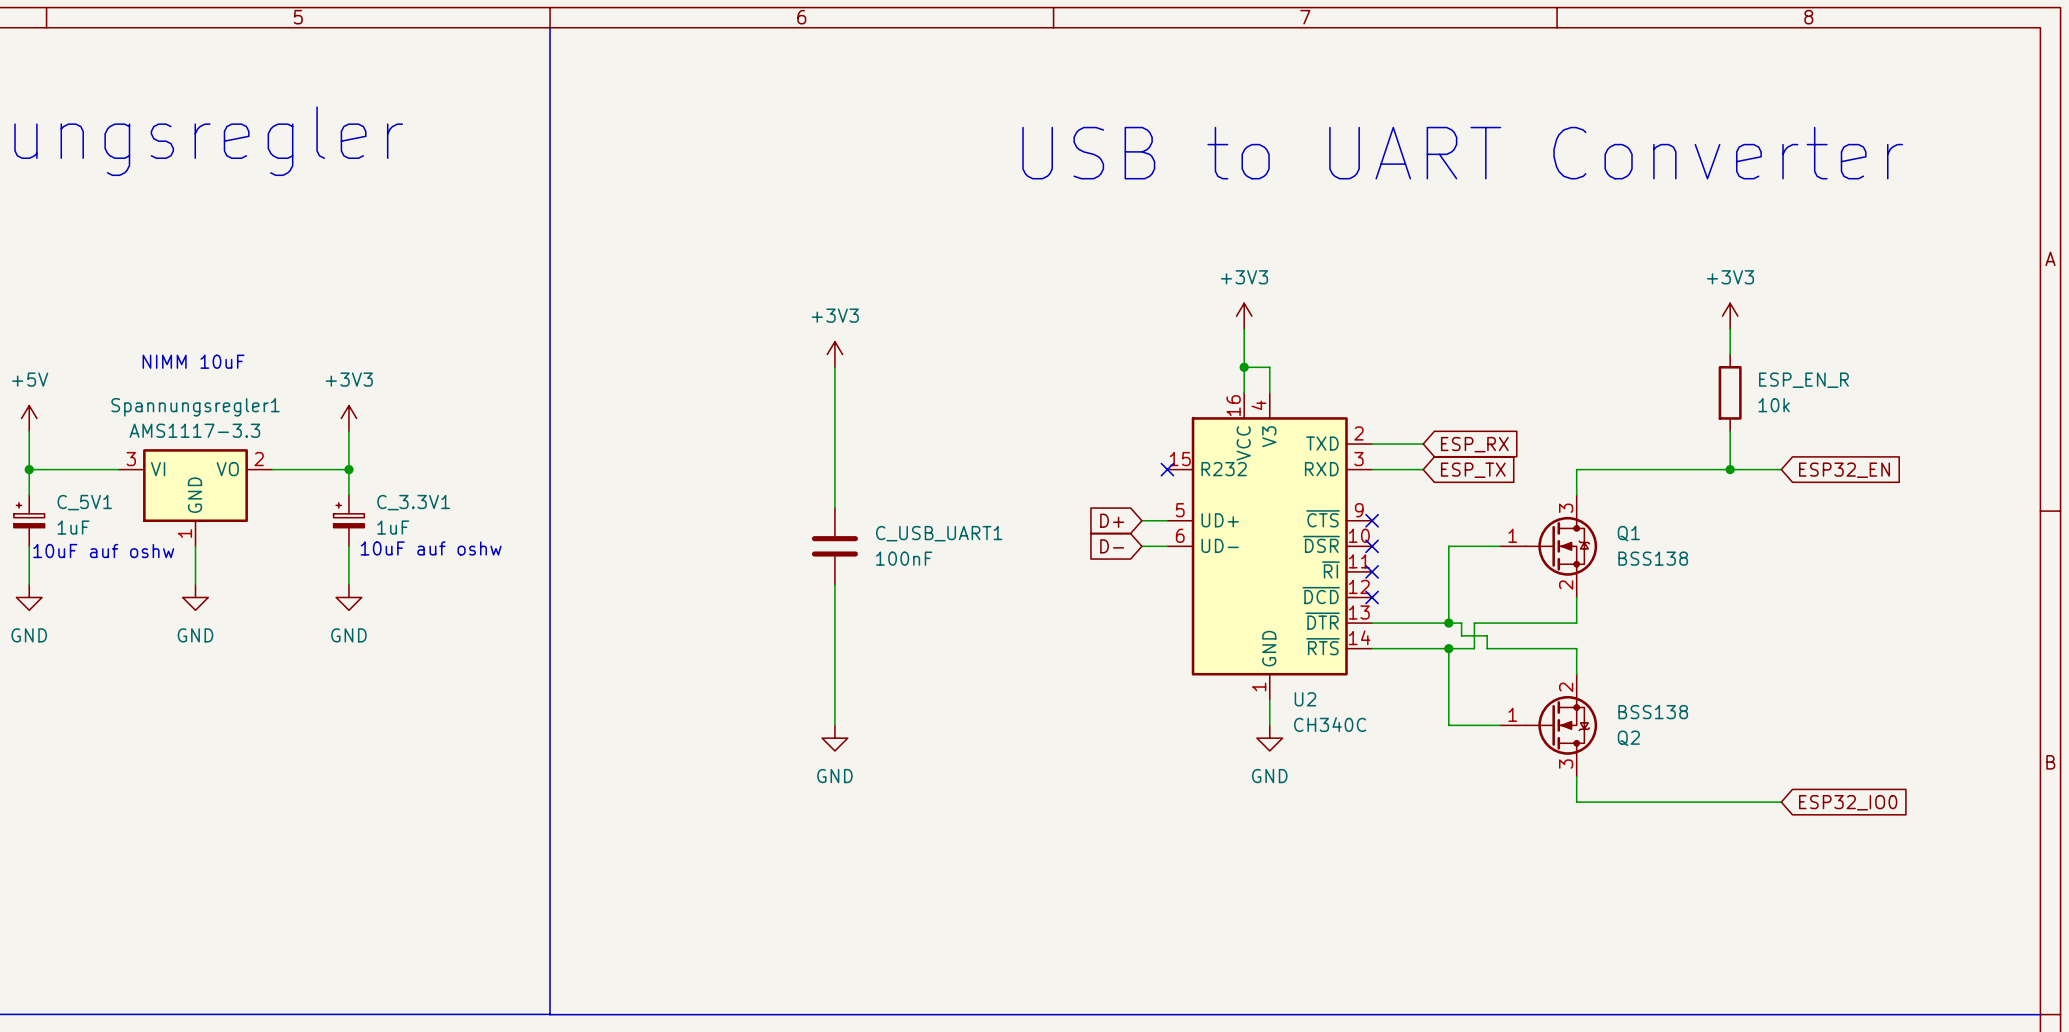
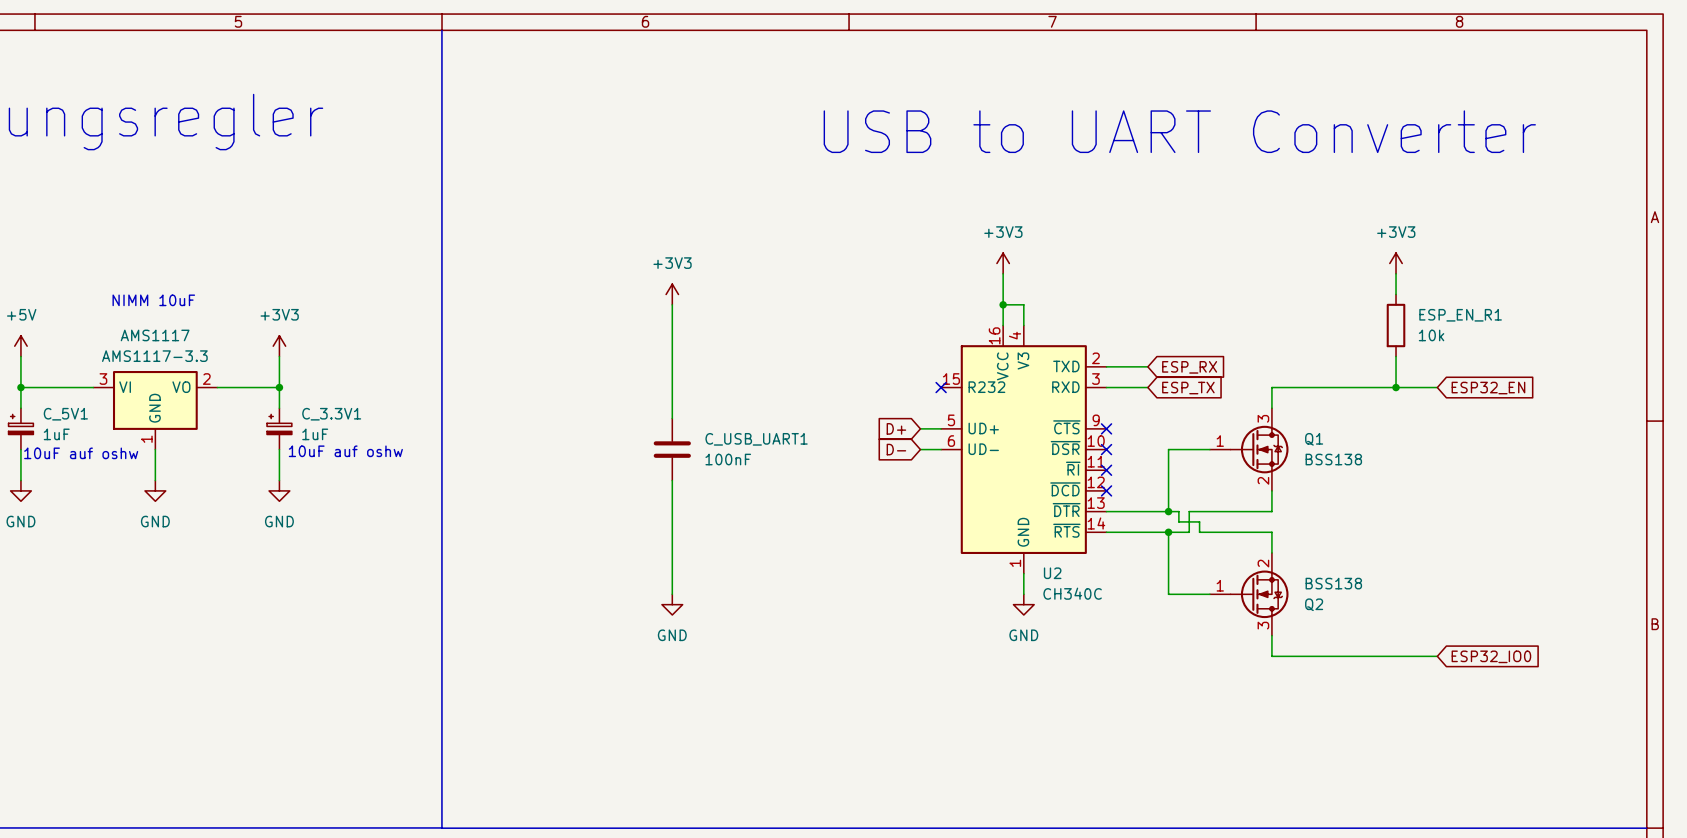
ESP_EN_R name: ESP_EN_R (1803, 380) -> ESP_EN_R1 (1460, 315)
Spannungsregler1 name: Spannungsregler1 (195, 407) -> AMS1117 (155, 335)

